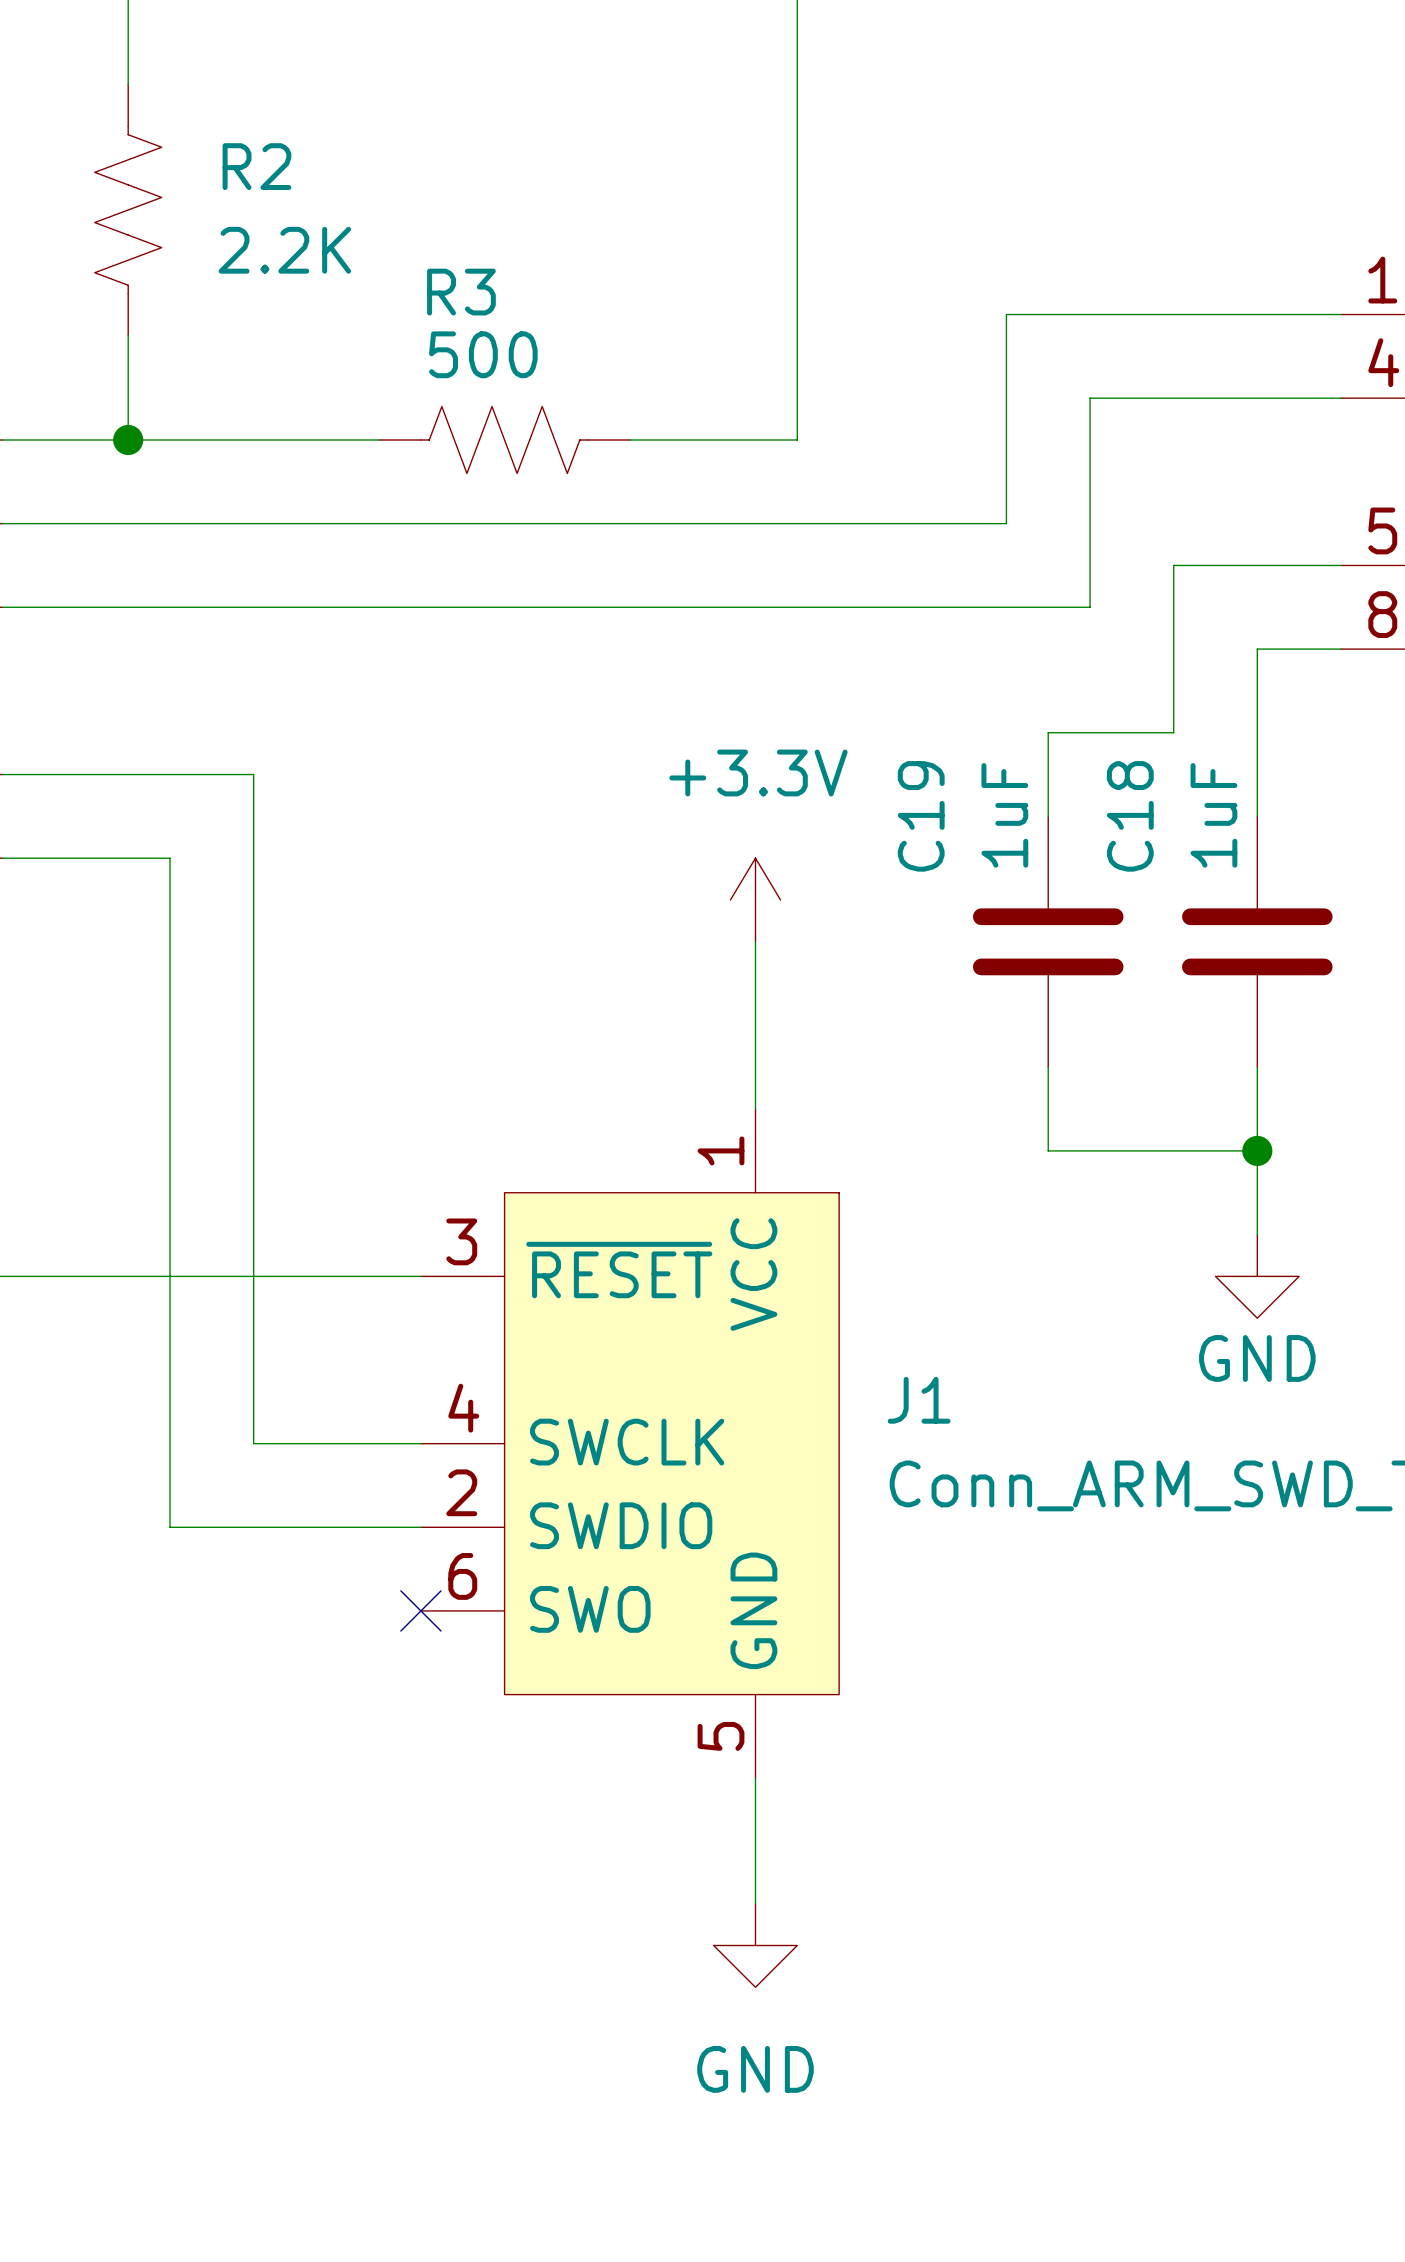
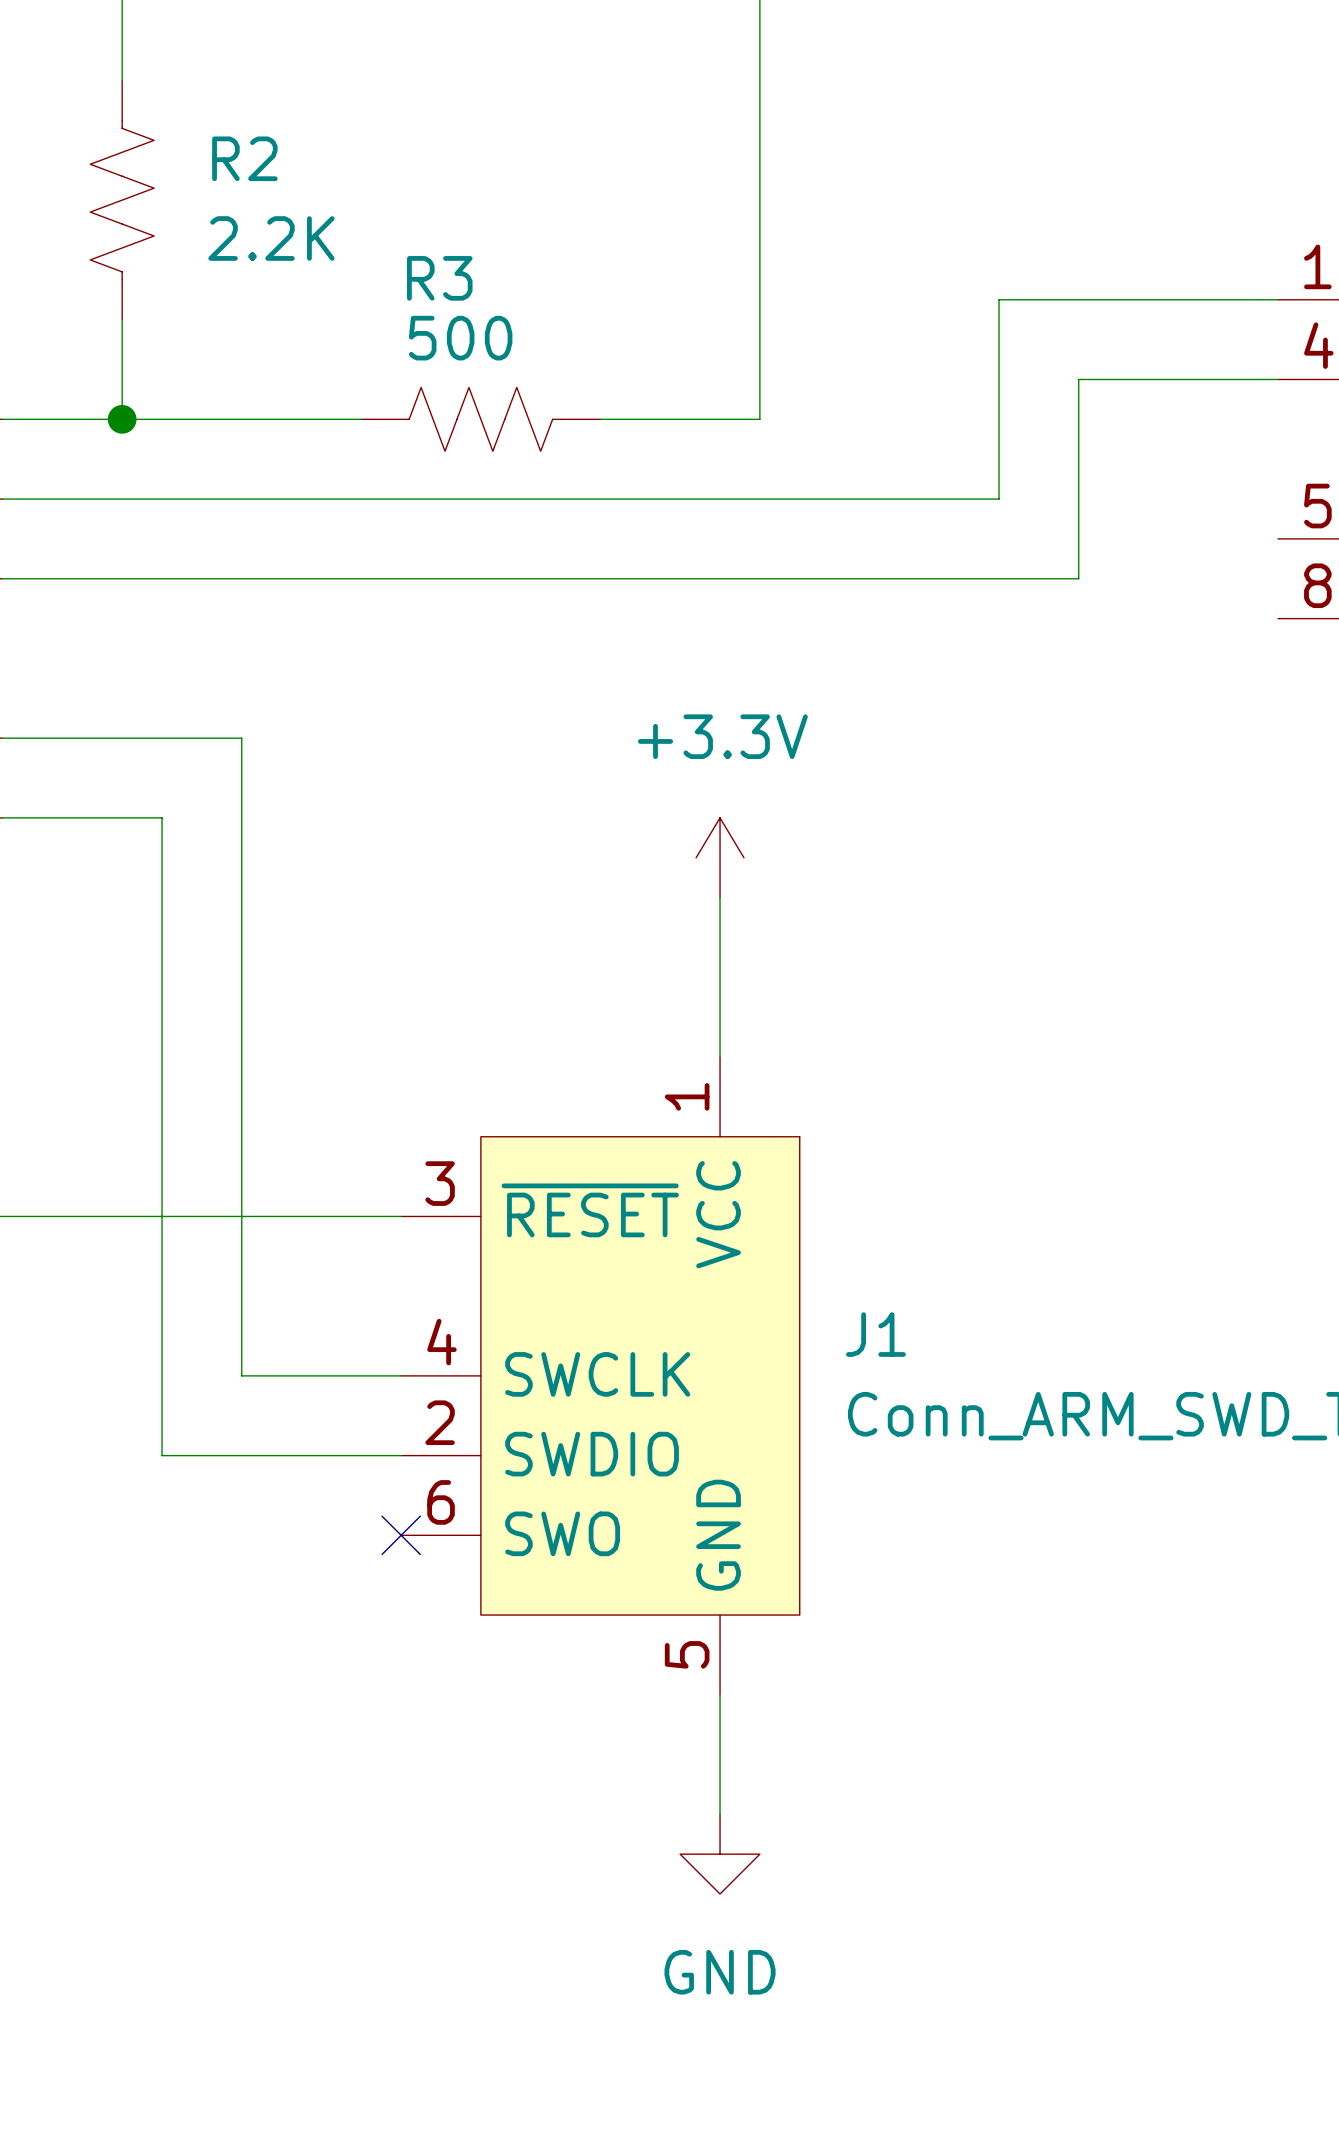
wire: (1048, 314) (1006, 314) (1006, 523) -> (999, 299) (999, 499) (959, 499)
wire: (1131, 398) (1090, 398) (1090, 607) -> (1078, 379) (1078, 578) (1038, 578)
wire: (1340, 565) (1173, 565) (1173, 732) (1048, 732) (1048, 816) -> none
wire: (1340, 649) (1257, 649) (1257, 816) -> none
C19: 1uF (1048, 941) -> none
C18: 1uF (1257, 941) -> none
wire: (1048, 1067) (1048, 1150) (1257, 1150) -> none
wire: (1257, 1067) (1257, 1234) -> none
junction: (1257, 1150) -> none
power symbol: GND (1257, 1276) -> none

